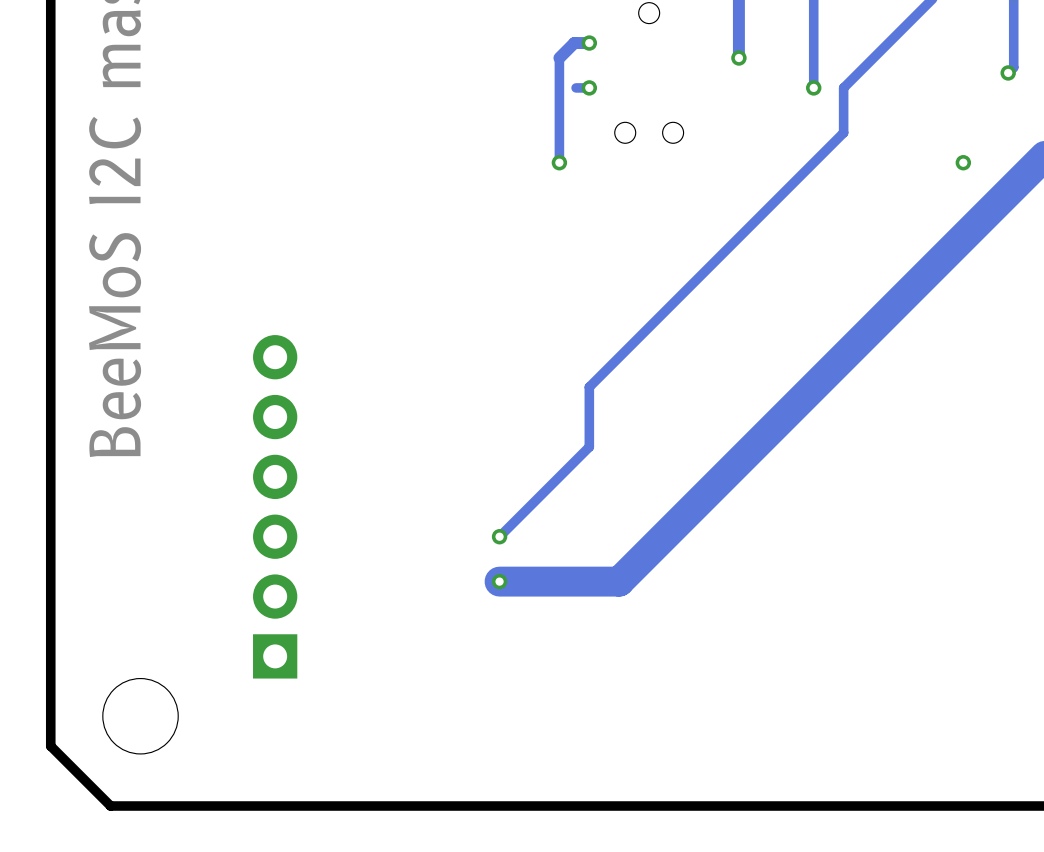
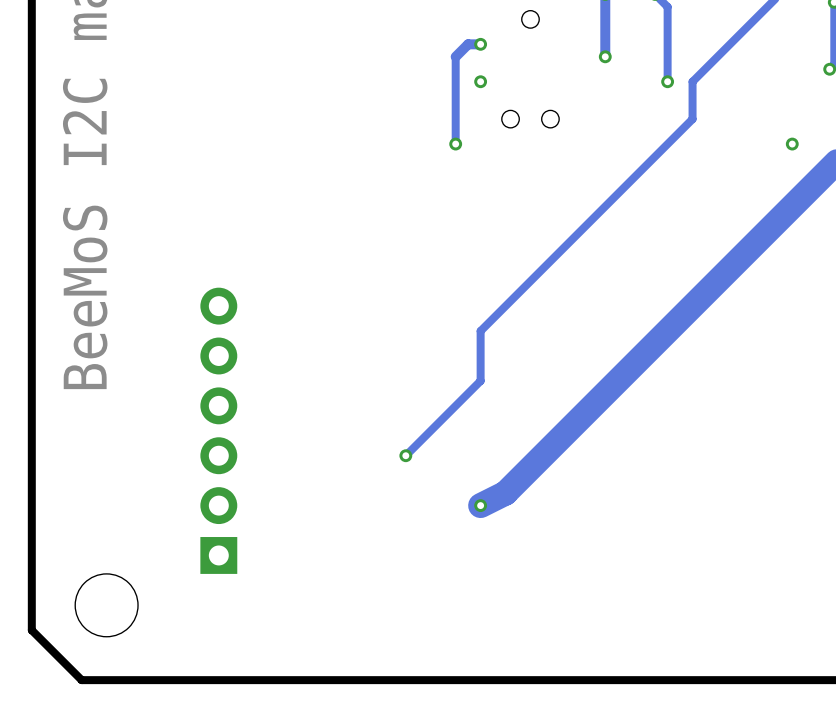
track: (589, 87) (576, 87) -> none
via position: (499, 581) -> (480, 505)
track: (619, 581) (499, 581) -> (505, 493) (480, 505)

